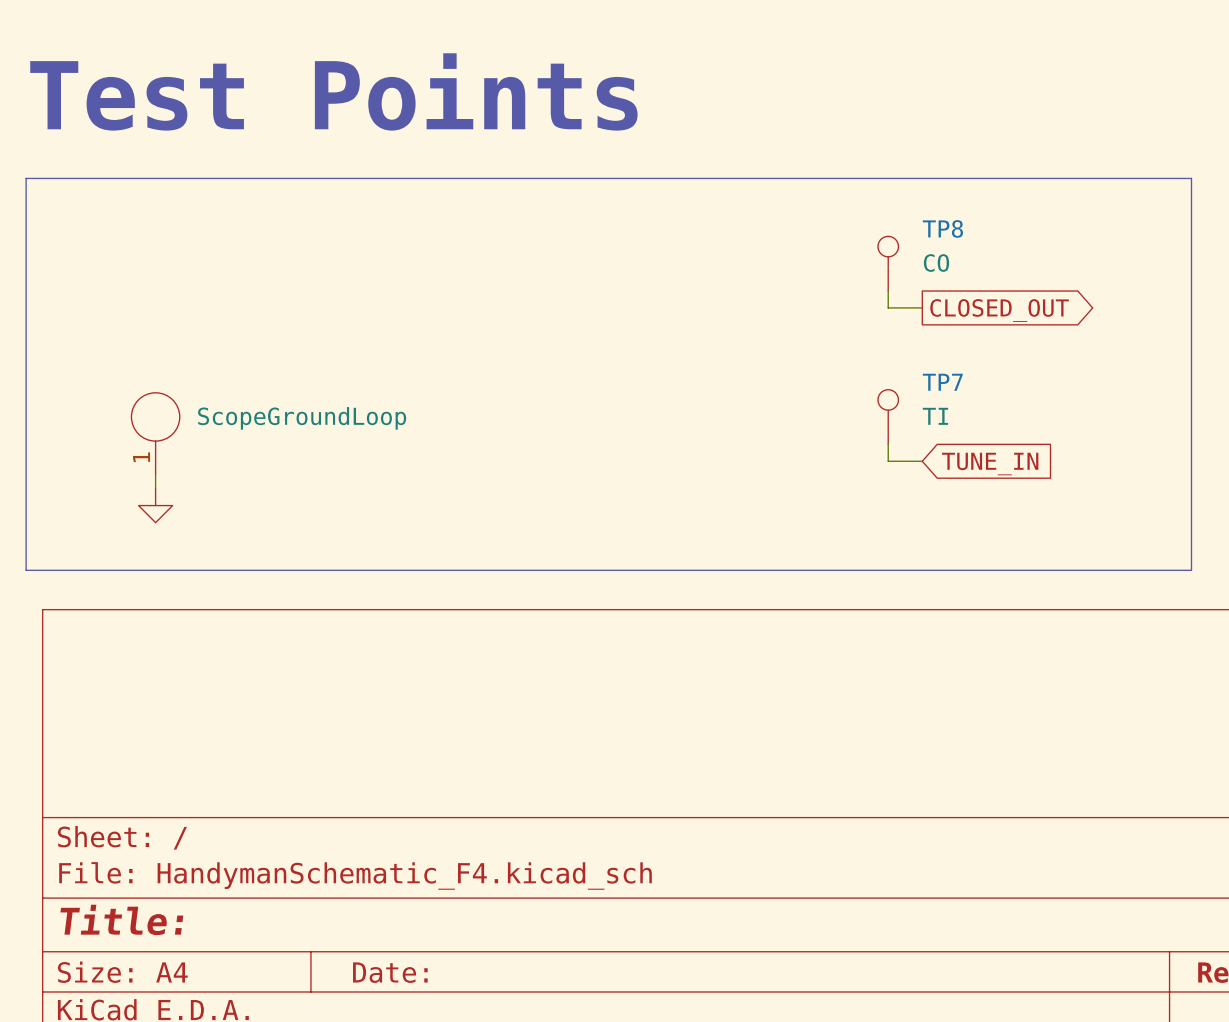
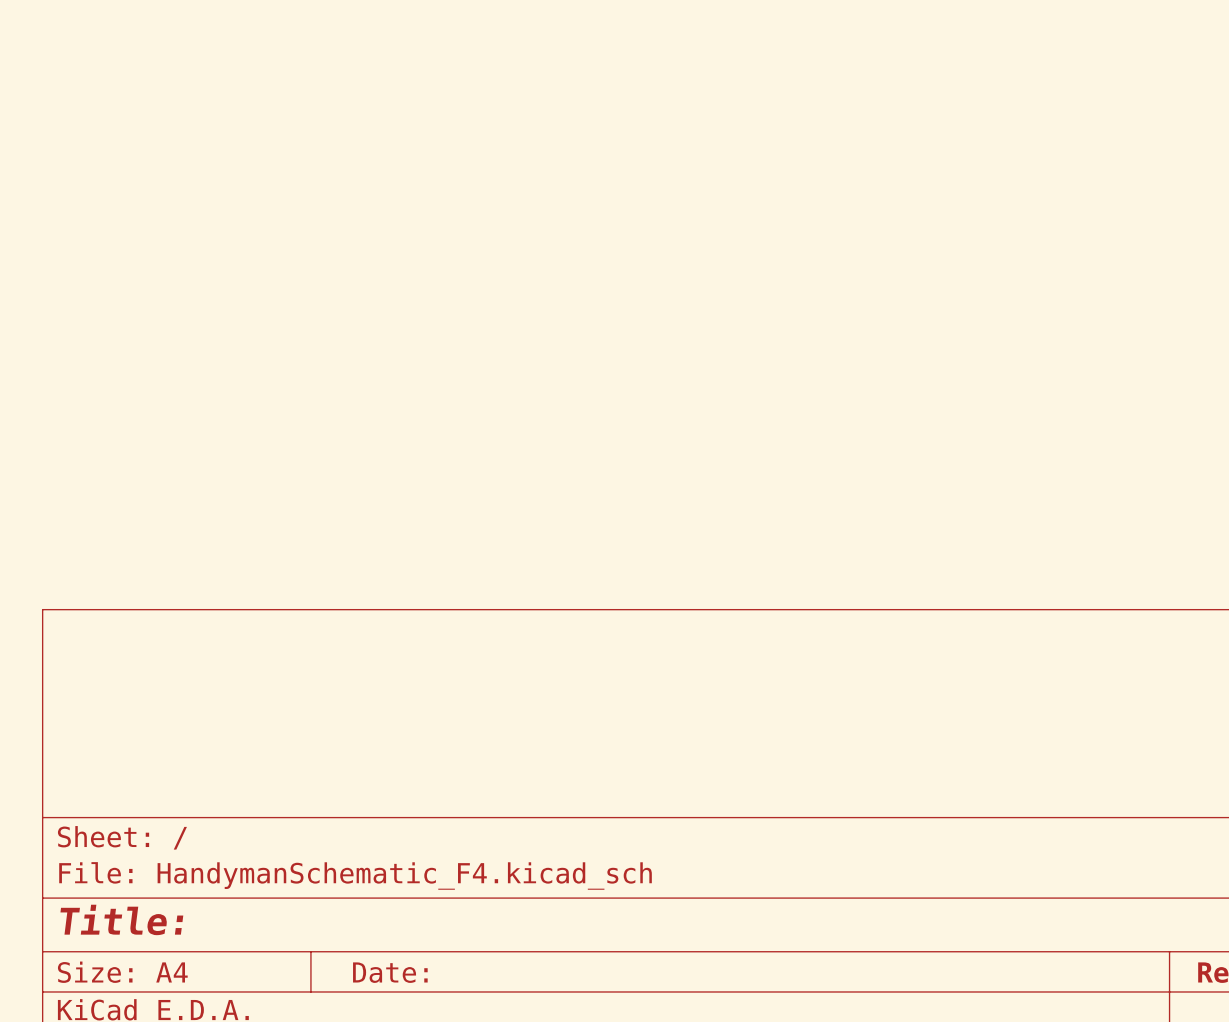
text: Test Points (333, 91) -> none
line: (26, 178) (1191, 178) (1191, 570) (26, 570) (26, 178) -> none
TP8: CO (888, 263) -> none
wire: (888, 290) (888, 307) (922, 307) -> none
global label: CLOSED_OUT (999, 310) -> none
TP7: TI (888, 416) -> none
part: ScopeGroundLoop (155, 433) -> none
wire: (888, 444) (888, 461) (922, 461) -> none
global label: TUNE_IN (990, 464) -> none
wire: (155, 474) (155, 488) -> none
power symbol: (155, 505) -> none

